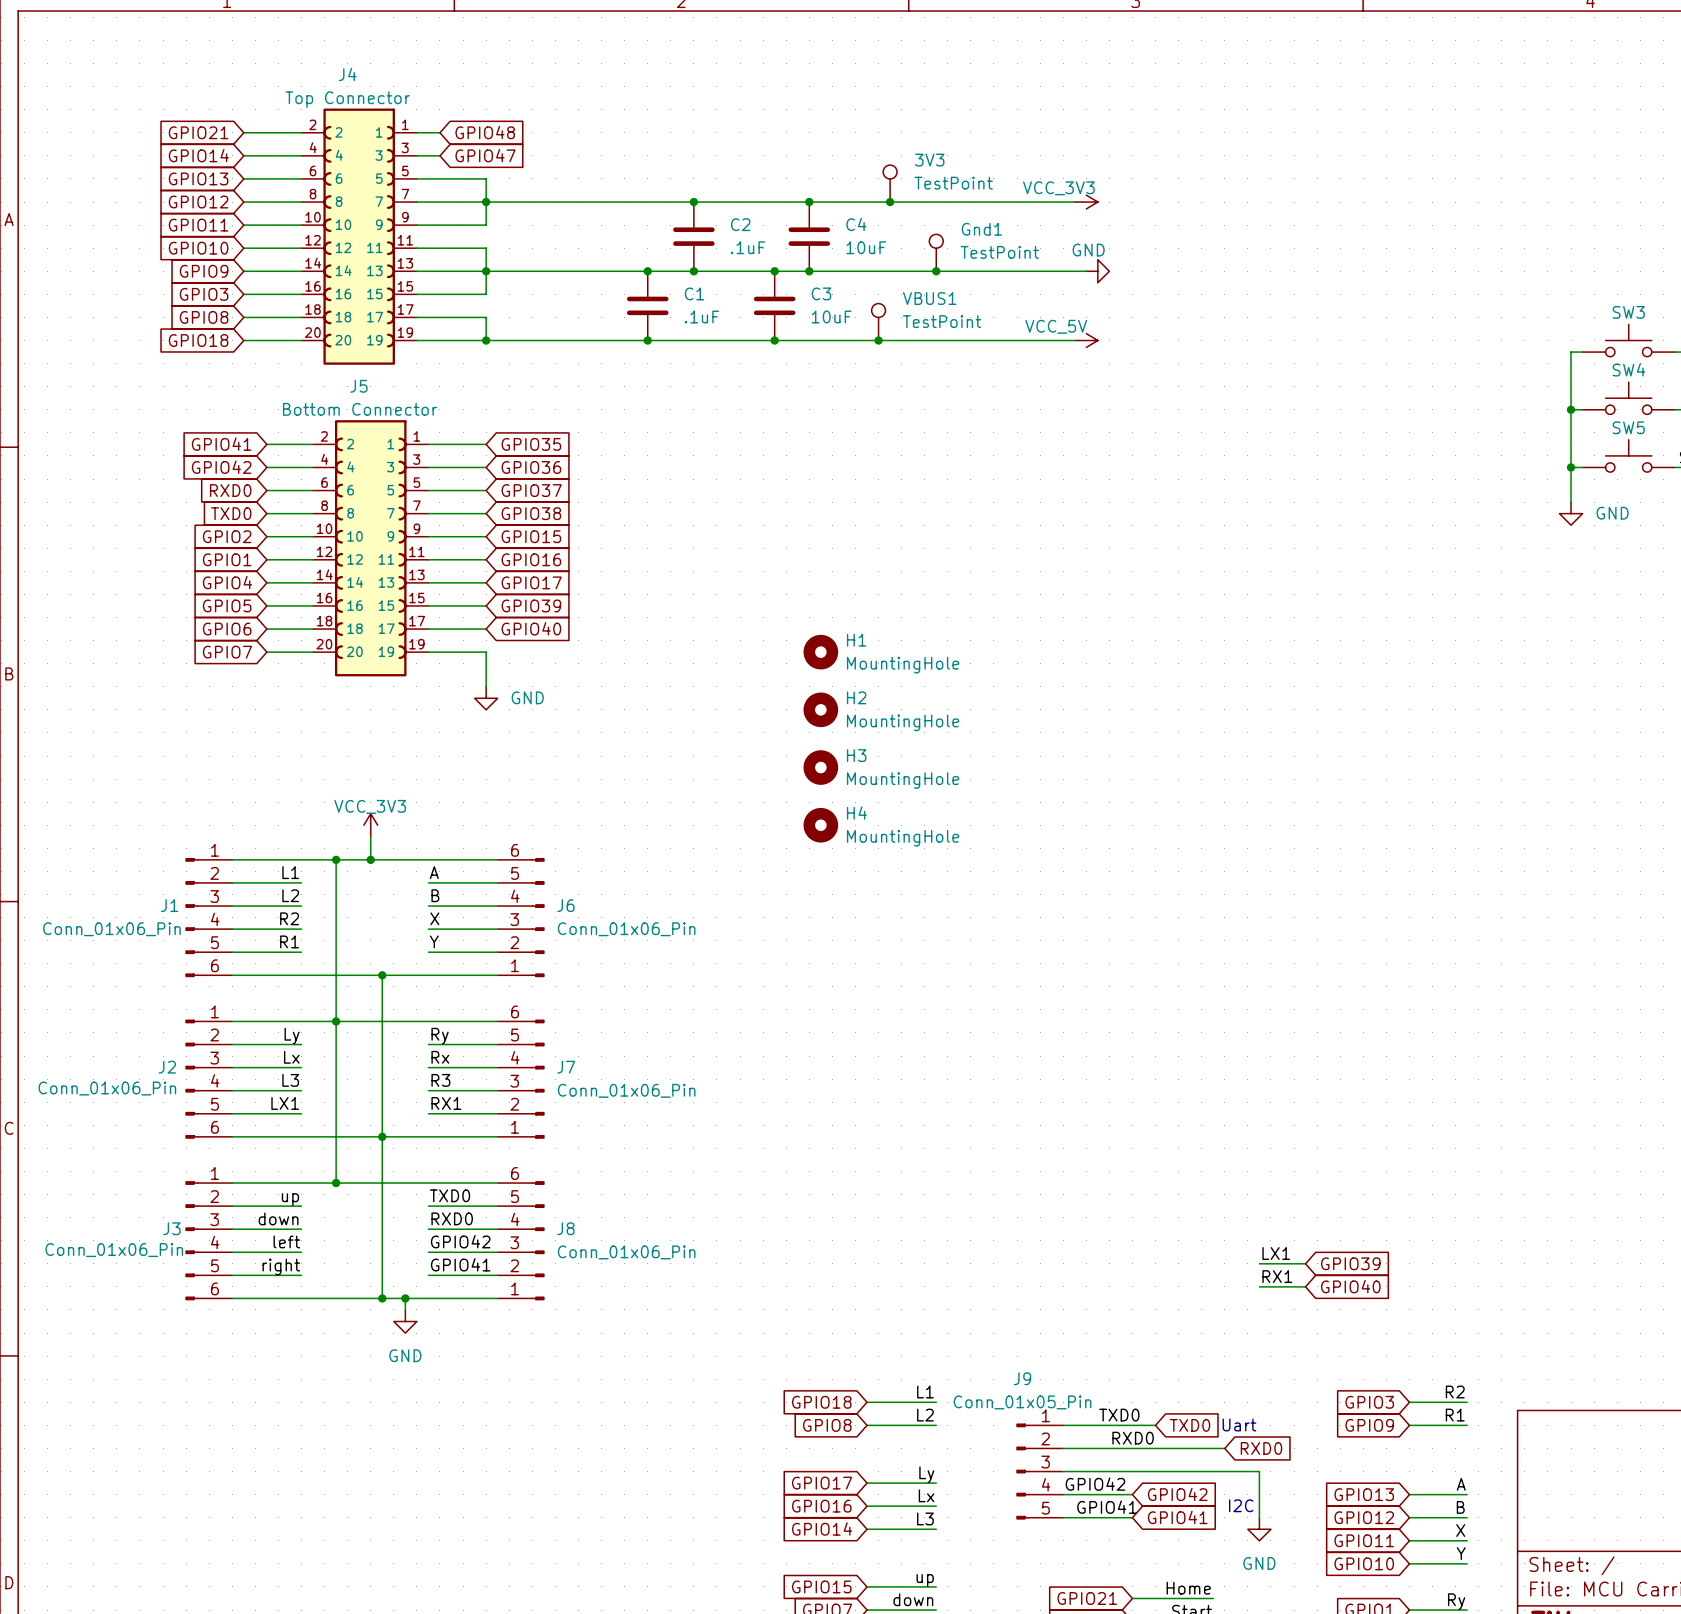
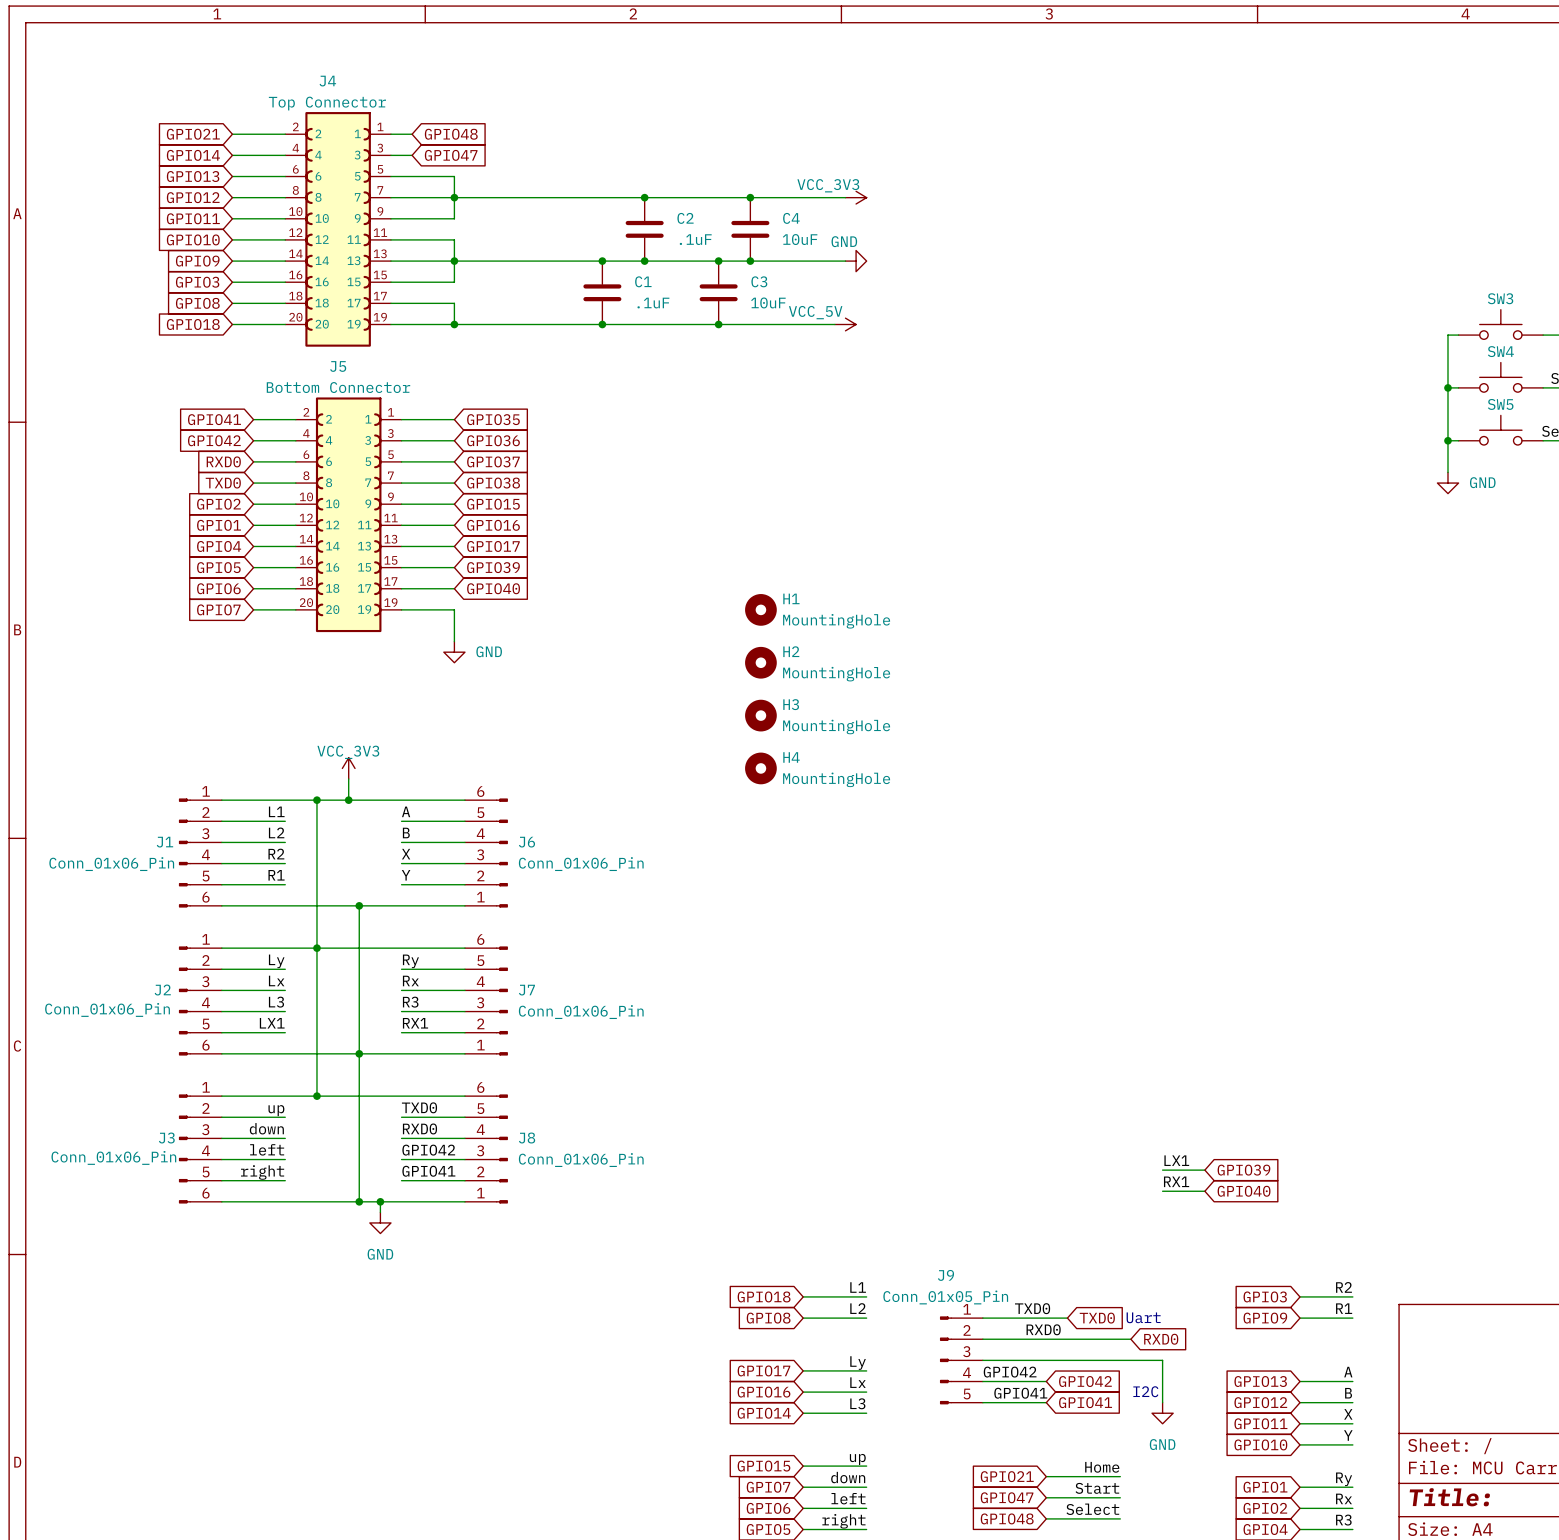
3V3: TestPoint (890, 183) -> none
junction: (890, 202) -> none
wire: (913, 202) (1074, 202) -> none
power symbol position: VCC_3V3 (1086, 202) -> VCC_3V3 (856, 197)
Gnd1: TestPoint (936, 252) -> none
wire: (913, 271) (1086, 271) -> none
junction: (936, 271) -> none
power symbol position: GND (1097, 271) -> GND (856, 261)
VBUS1: TestPoint (878, 322) -> none
junction: (878, 340) -> none
wire: (901, 340) (1074, 340) -> none
power symbol position: VCC_5V (1086, 340) -> VCC_5V (845, 324)

